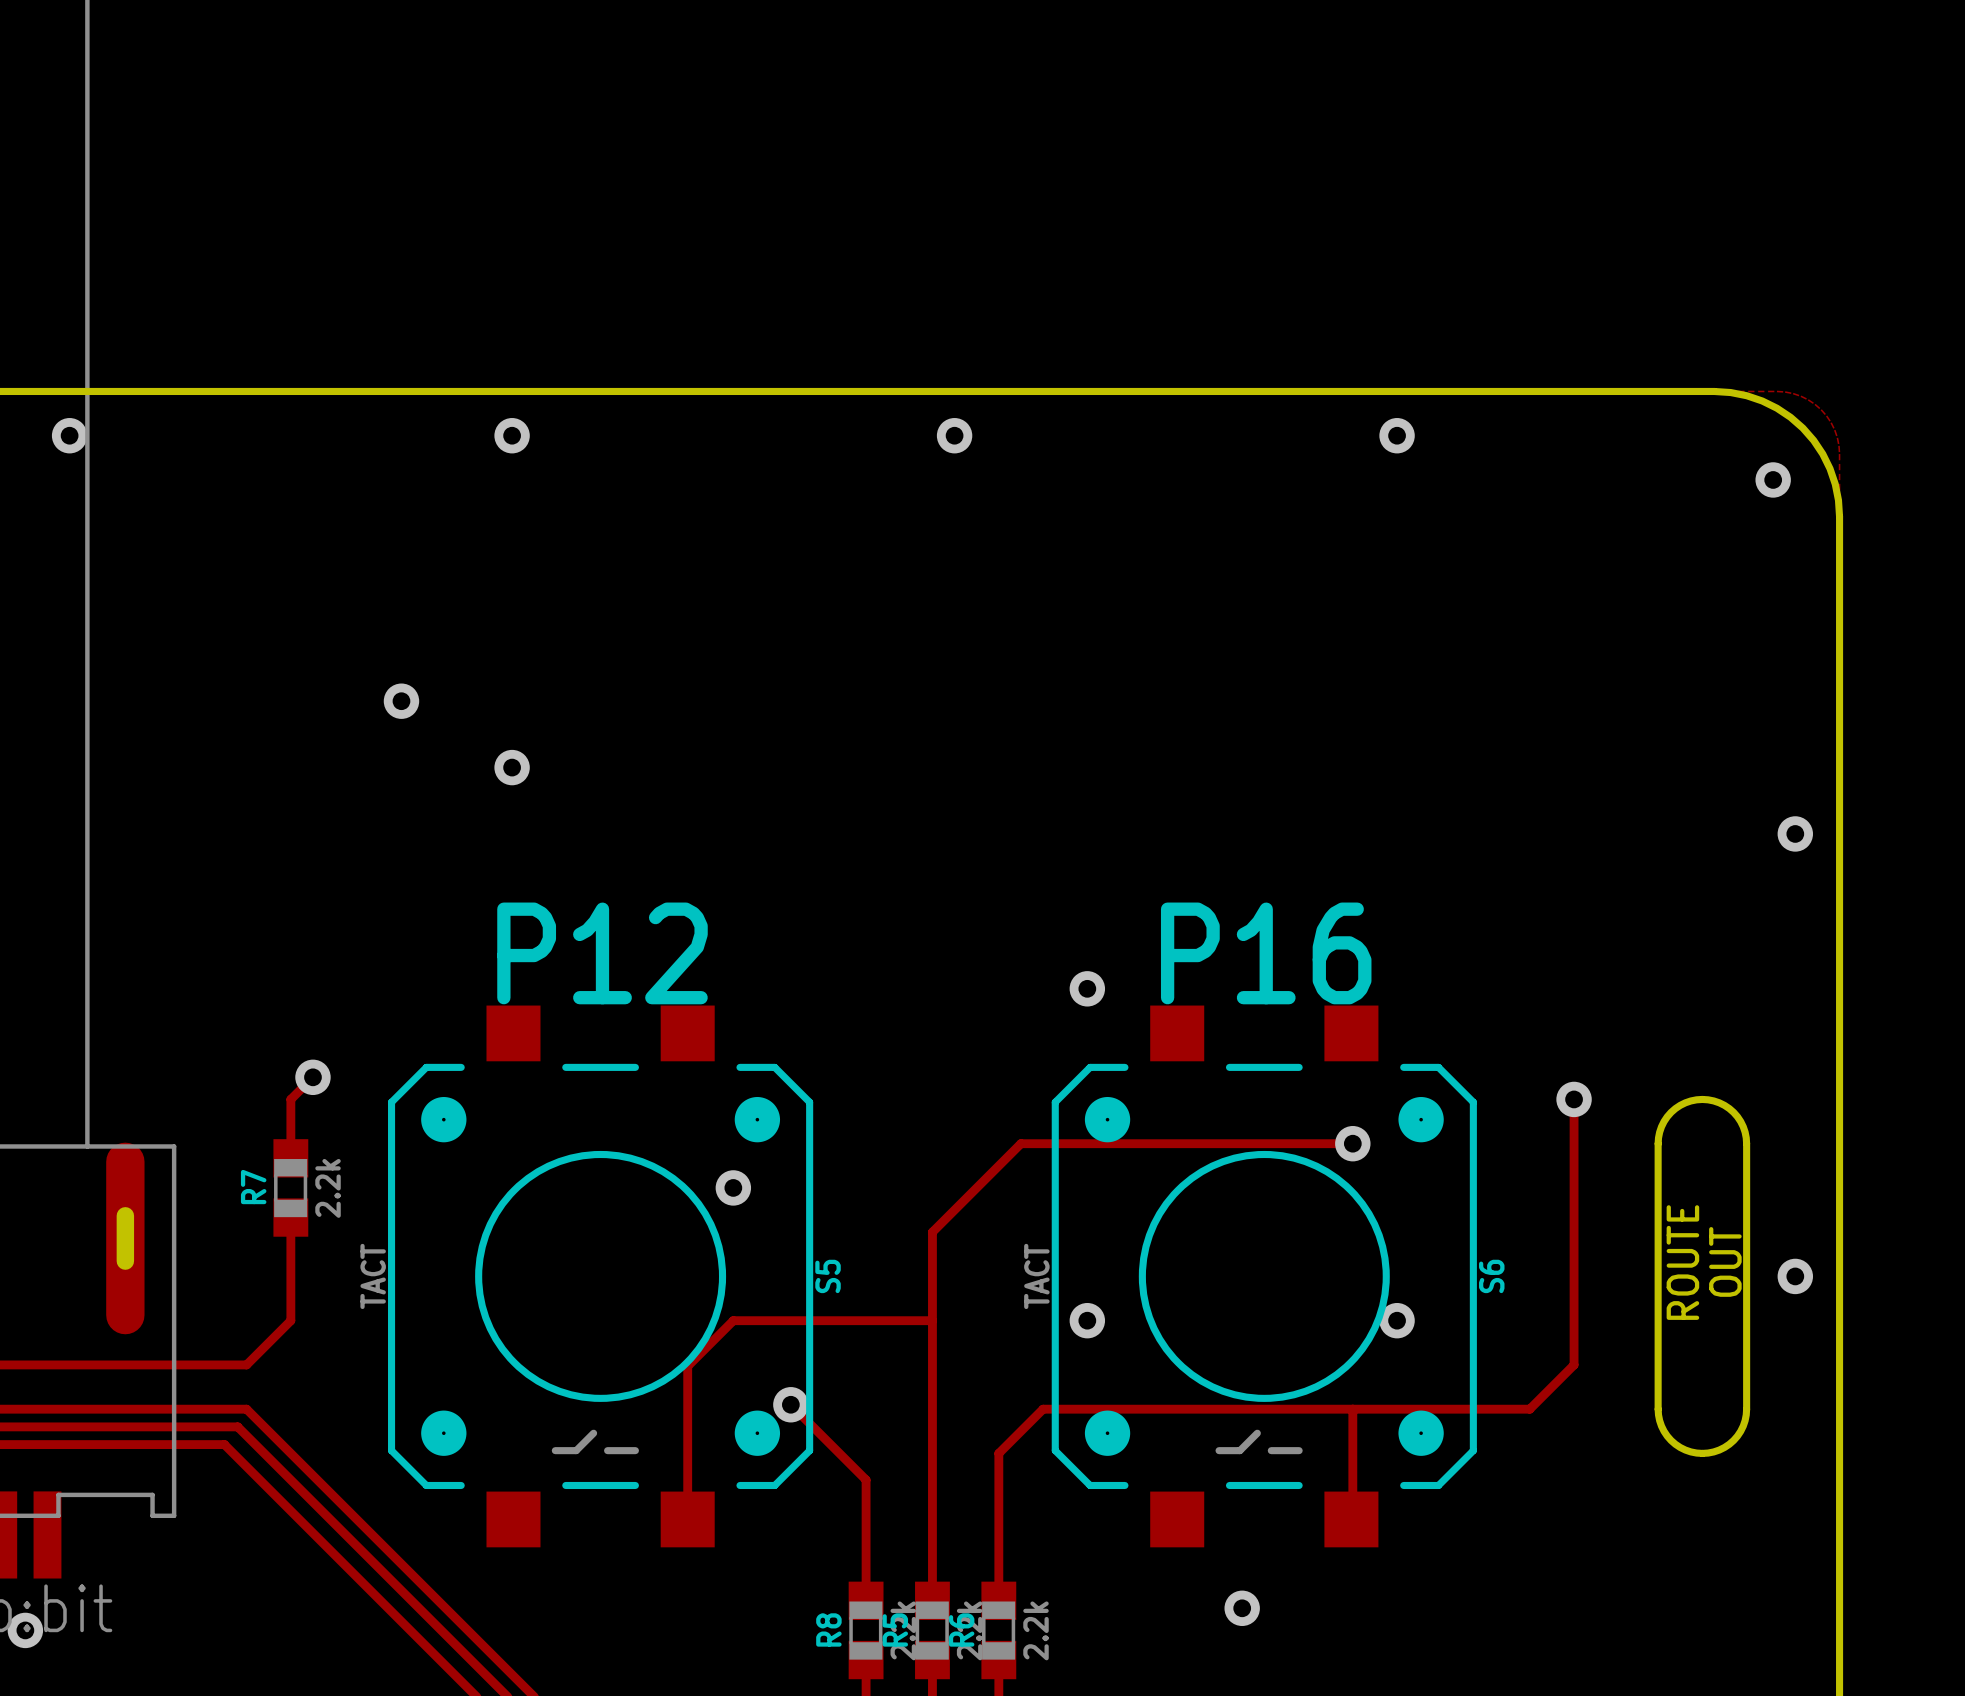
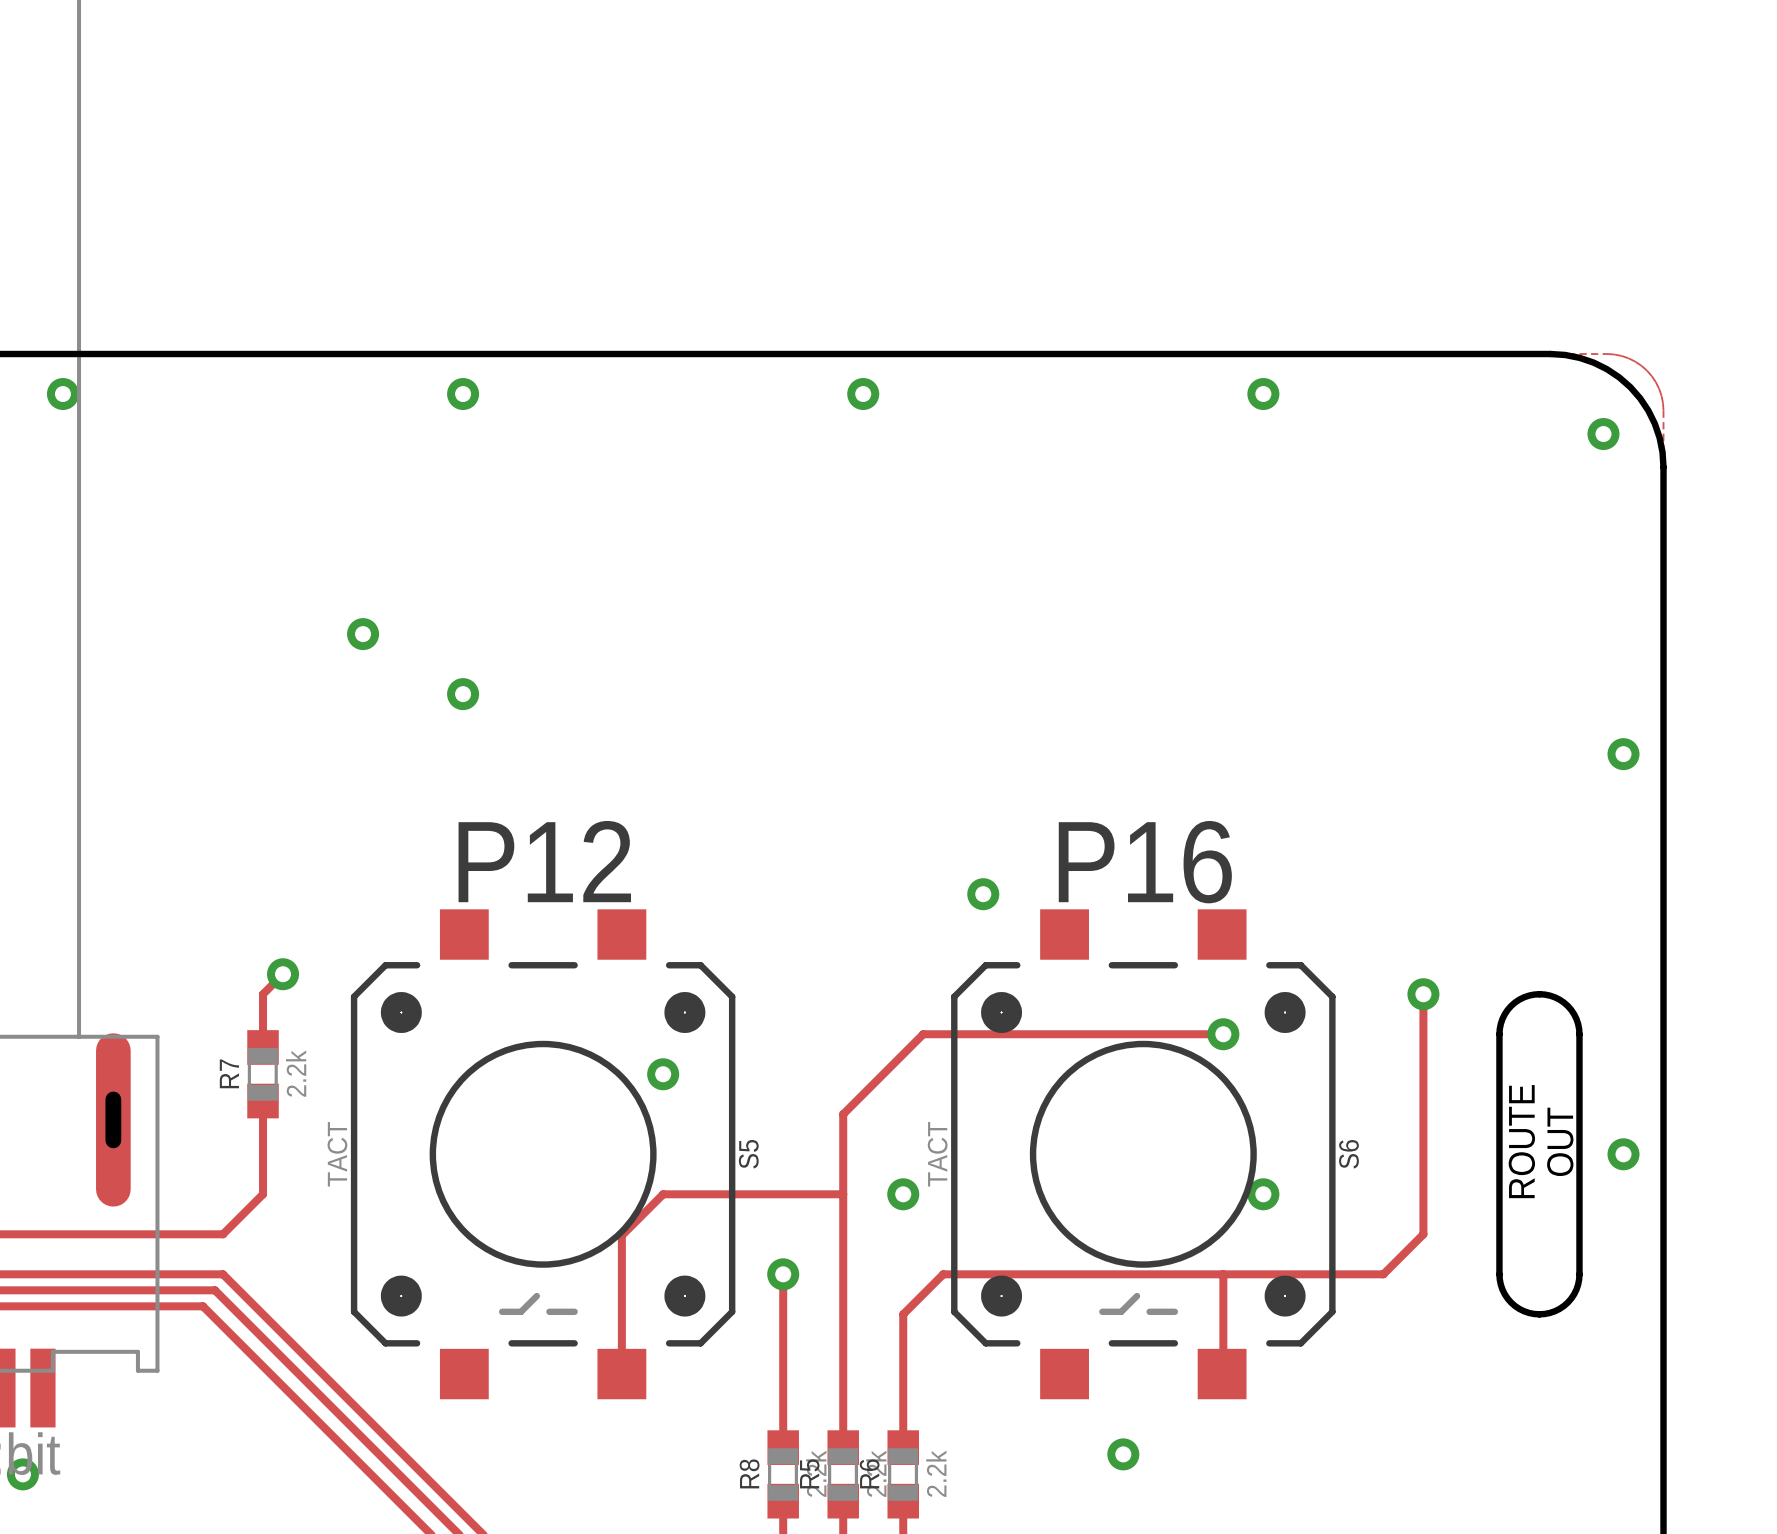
via position: (1087, 1320) -> (903, 1194)
track: (790, 1404) (866, 1479) -> (783, 1274) (783, 1338)
via position: (790, 1404) -> (783, 1274)

